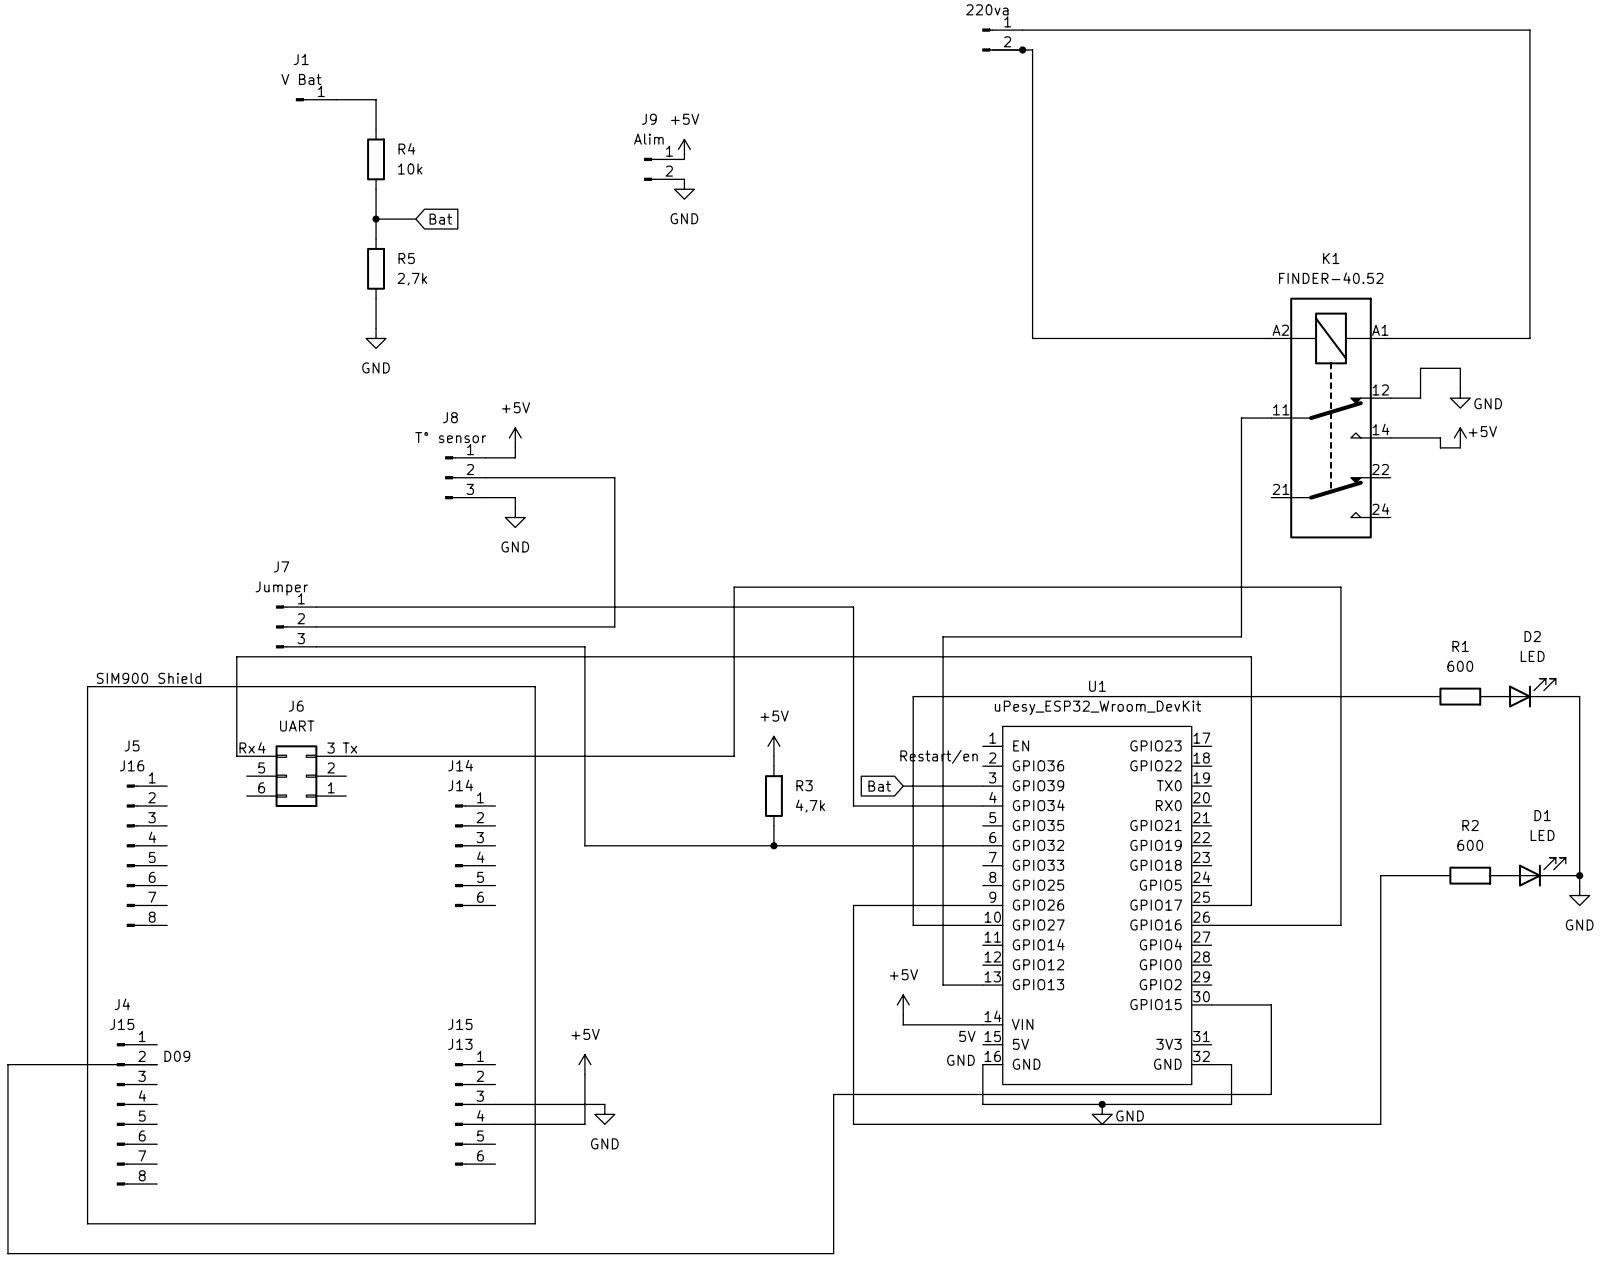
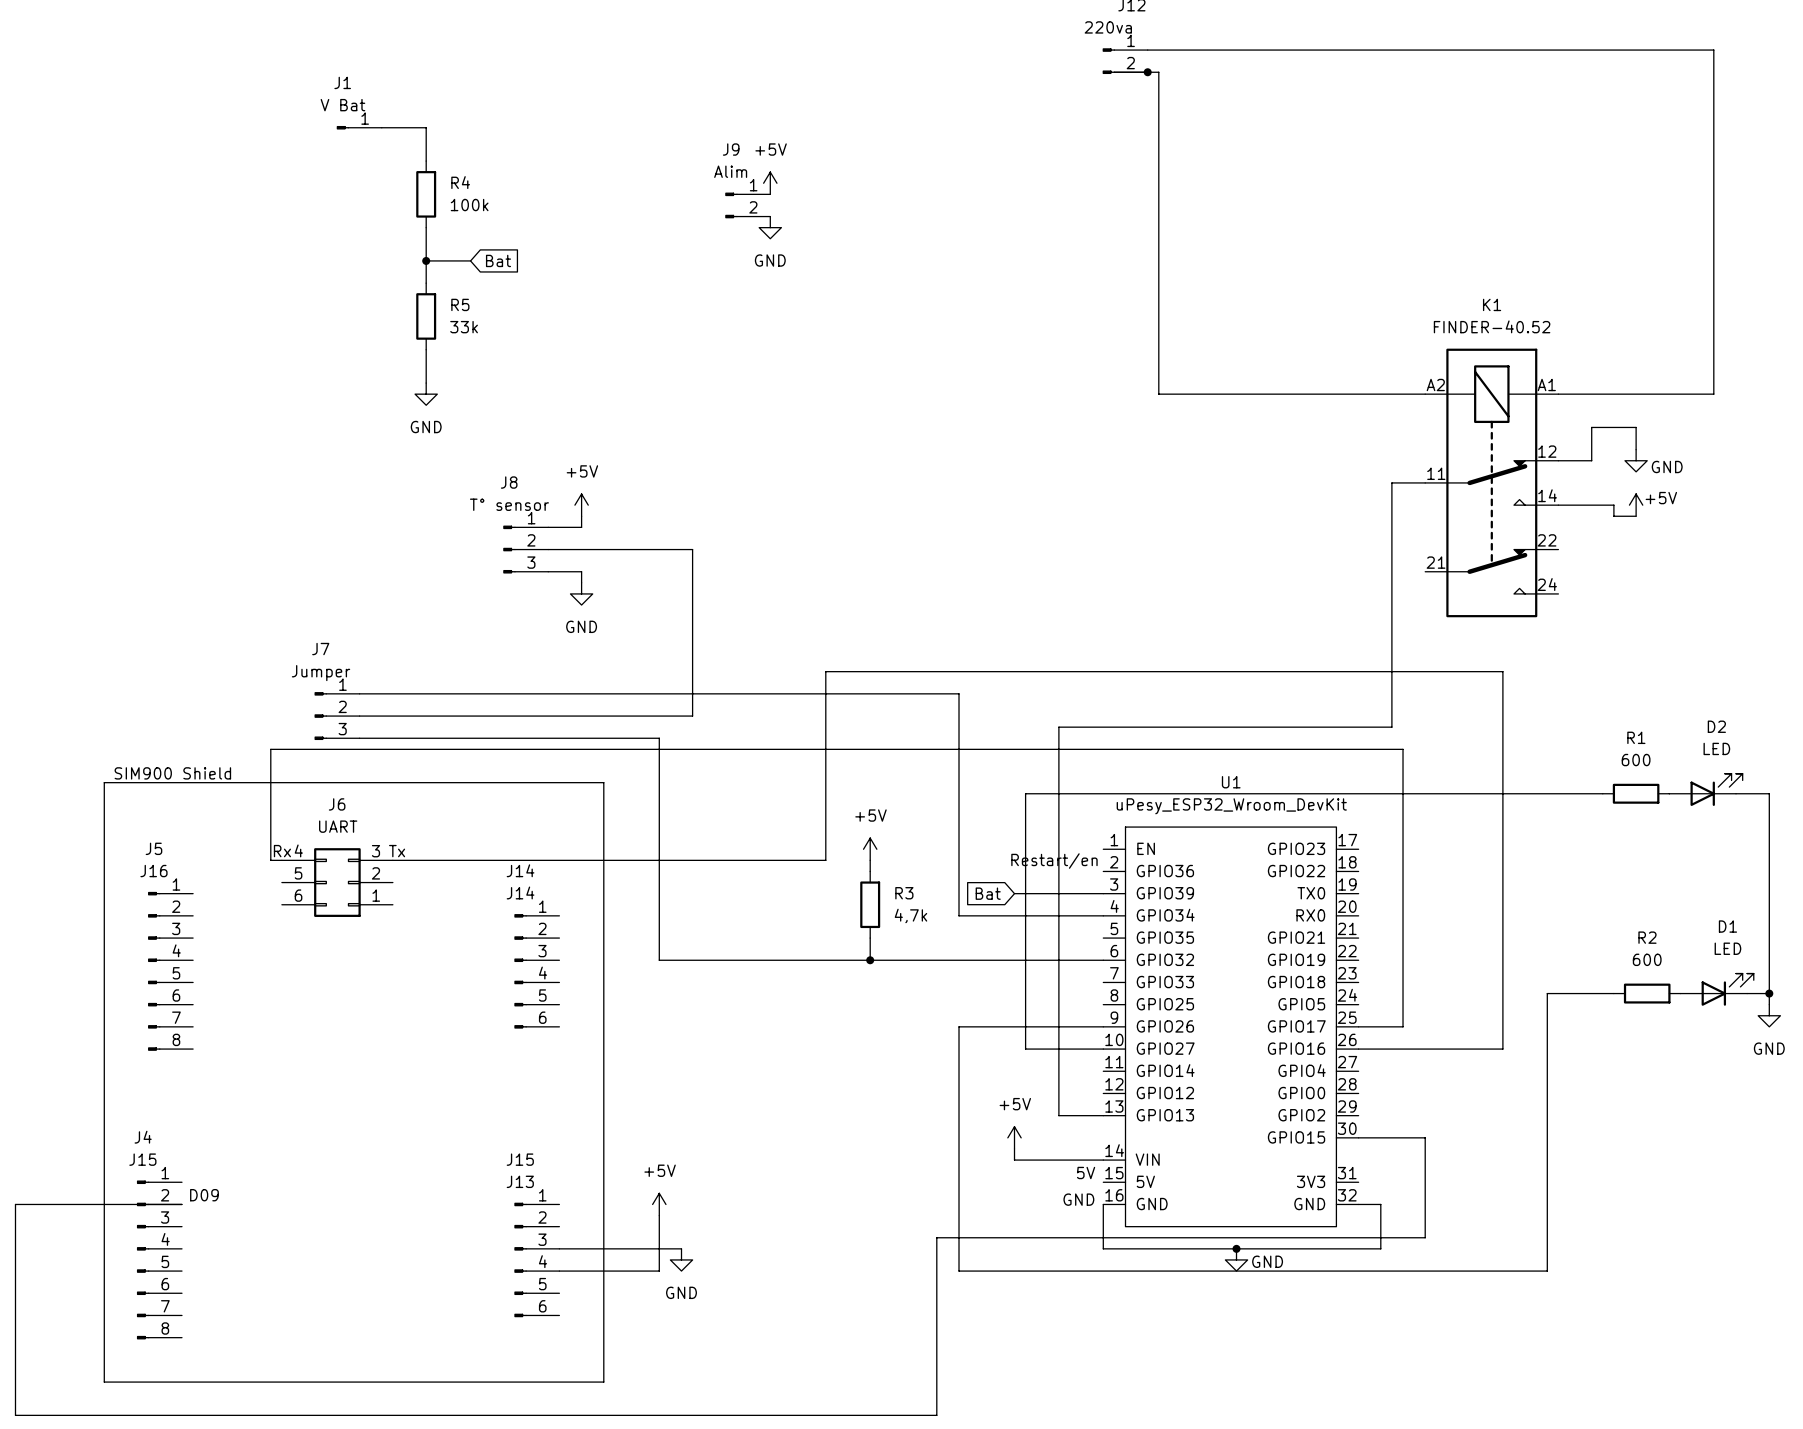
R4 value: 10k (410, 168) -> 100k (469, 205)
R5 value: 2,7k (412, 279) -> 33k (464, 327)

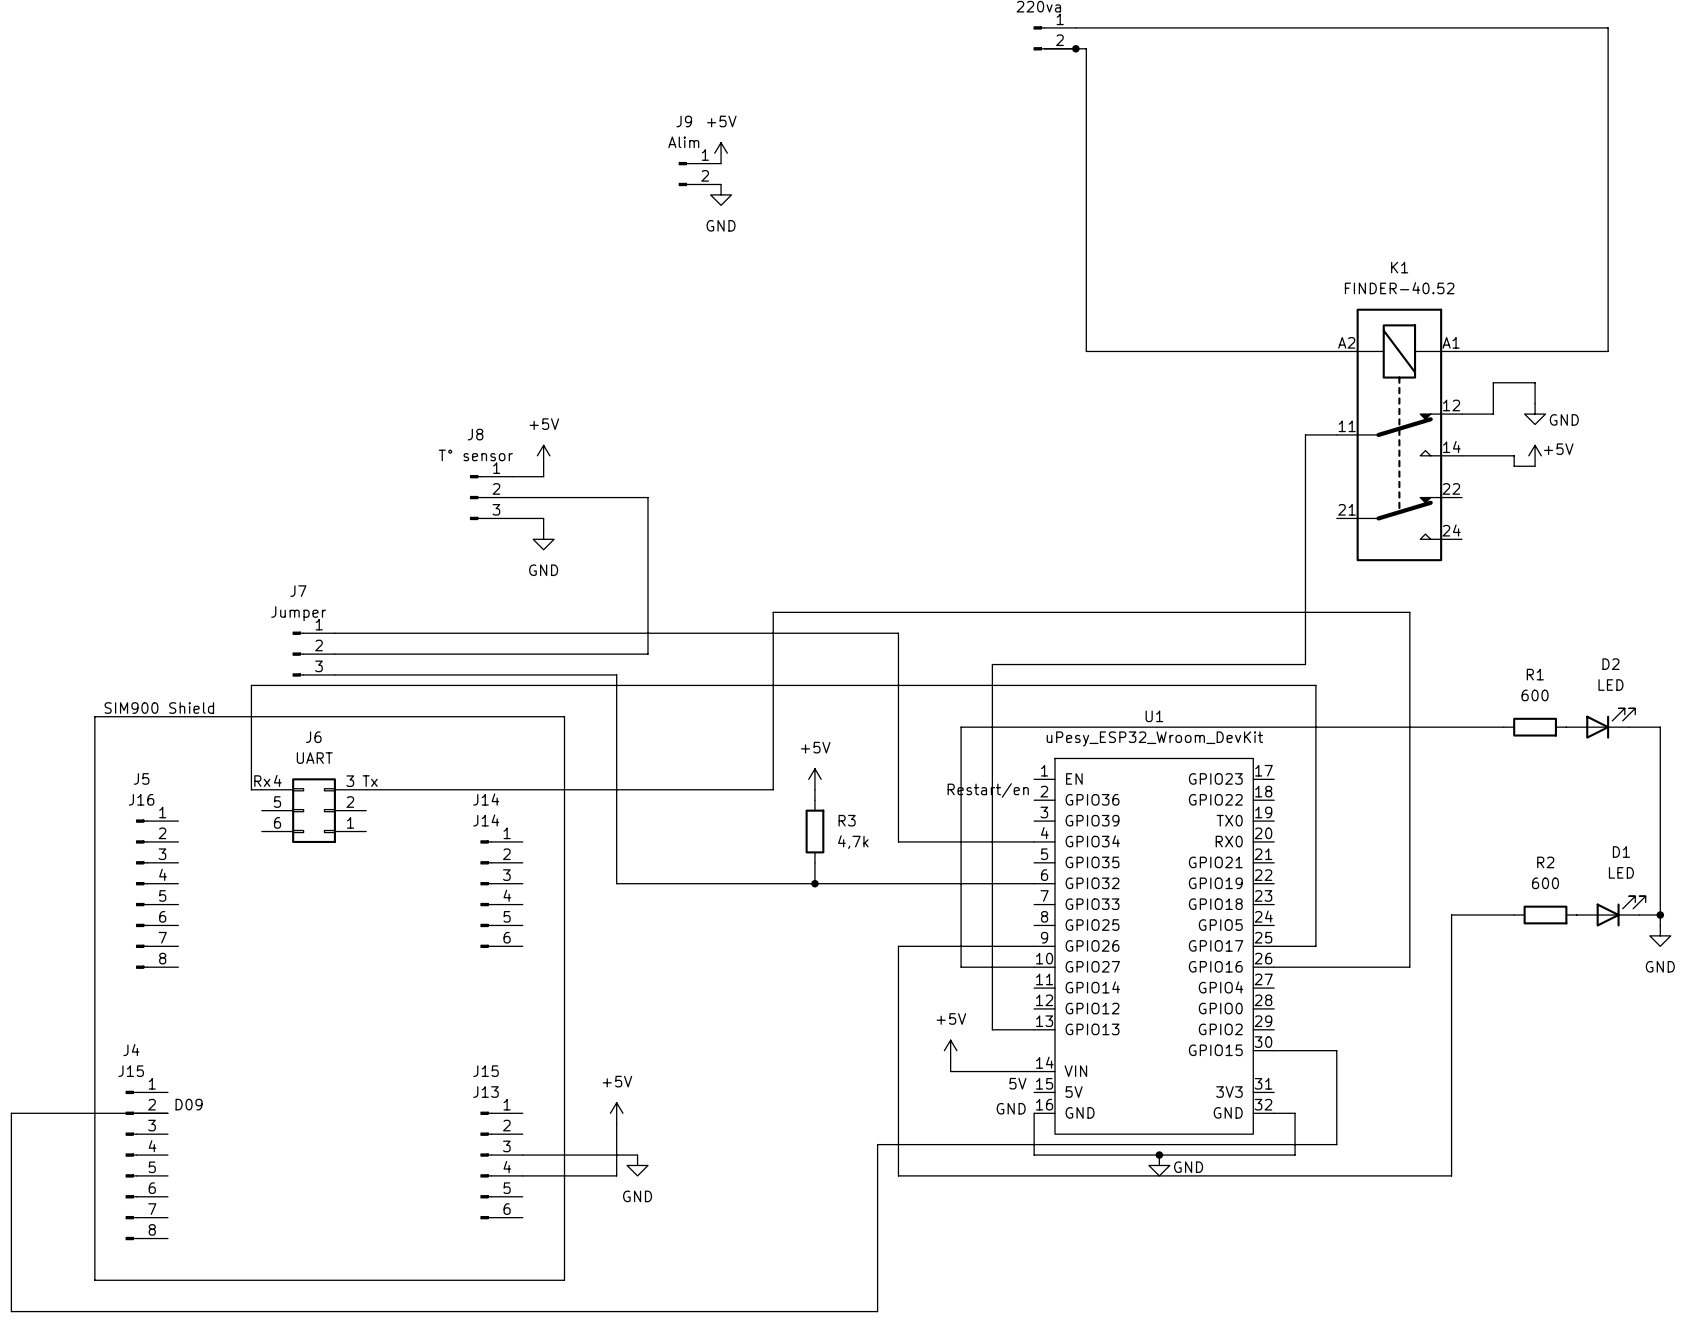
J1: V Bat (359, 127) -> none
wire: (381, 127) (426, 127) (426, 161) -> none
R4: 100k (426, 194) -> none
wire: (426, 227) (426, 283) -> none
wire: (426, 260) (470, 260) -> none
junction: (426, 260) -> none
global label: Bat (498, 260) -> none
R5: 33k (426, 316) -> none
wire: (426, 349) (426, 383) -> none
power symbol: GND (426, 394) -> none
global label: Bat (988, 893) -> none
wire: (1014, 893) (1103, 893) -> none

